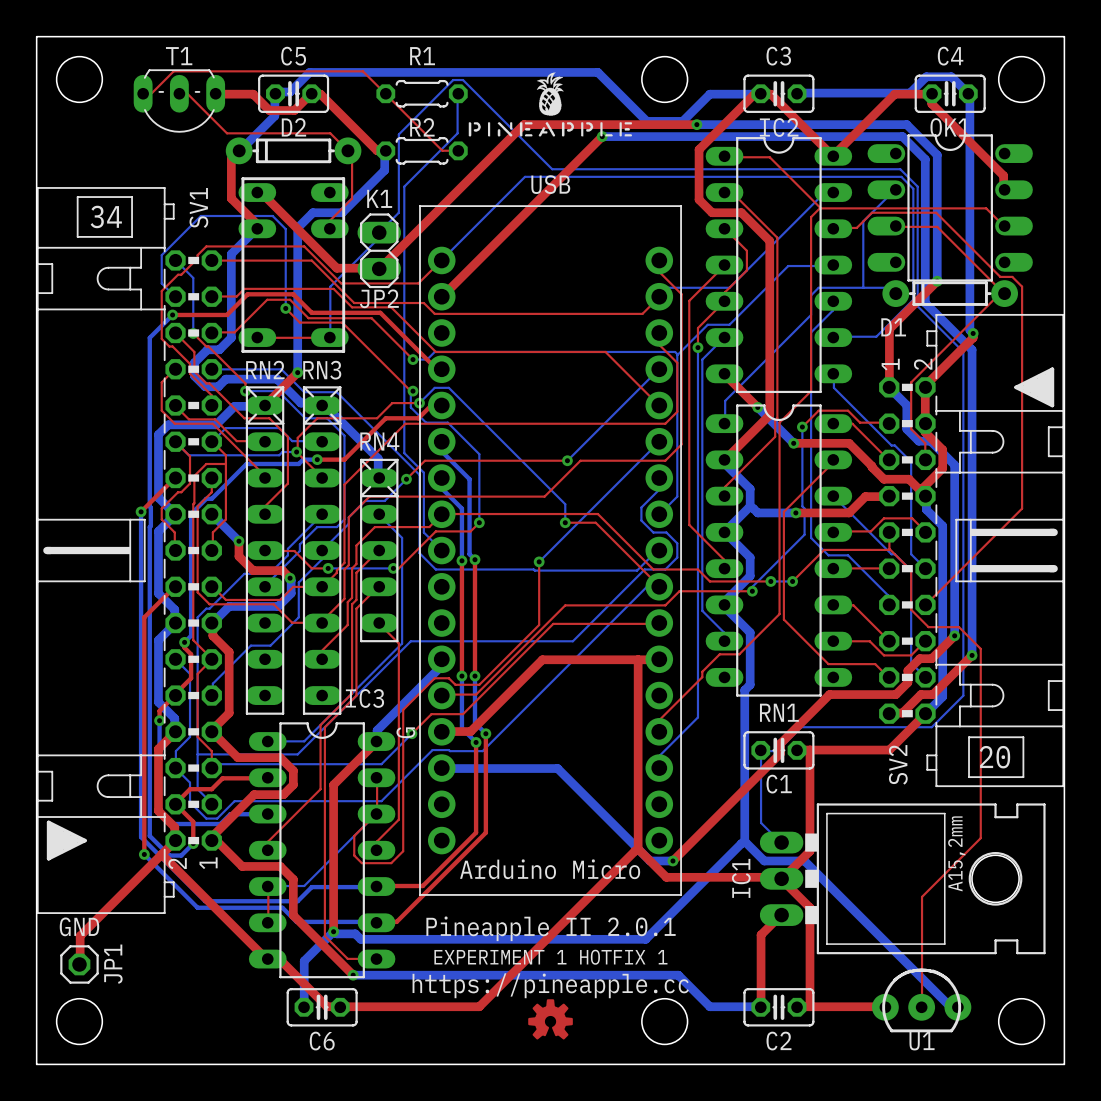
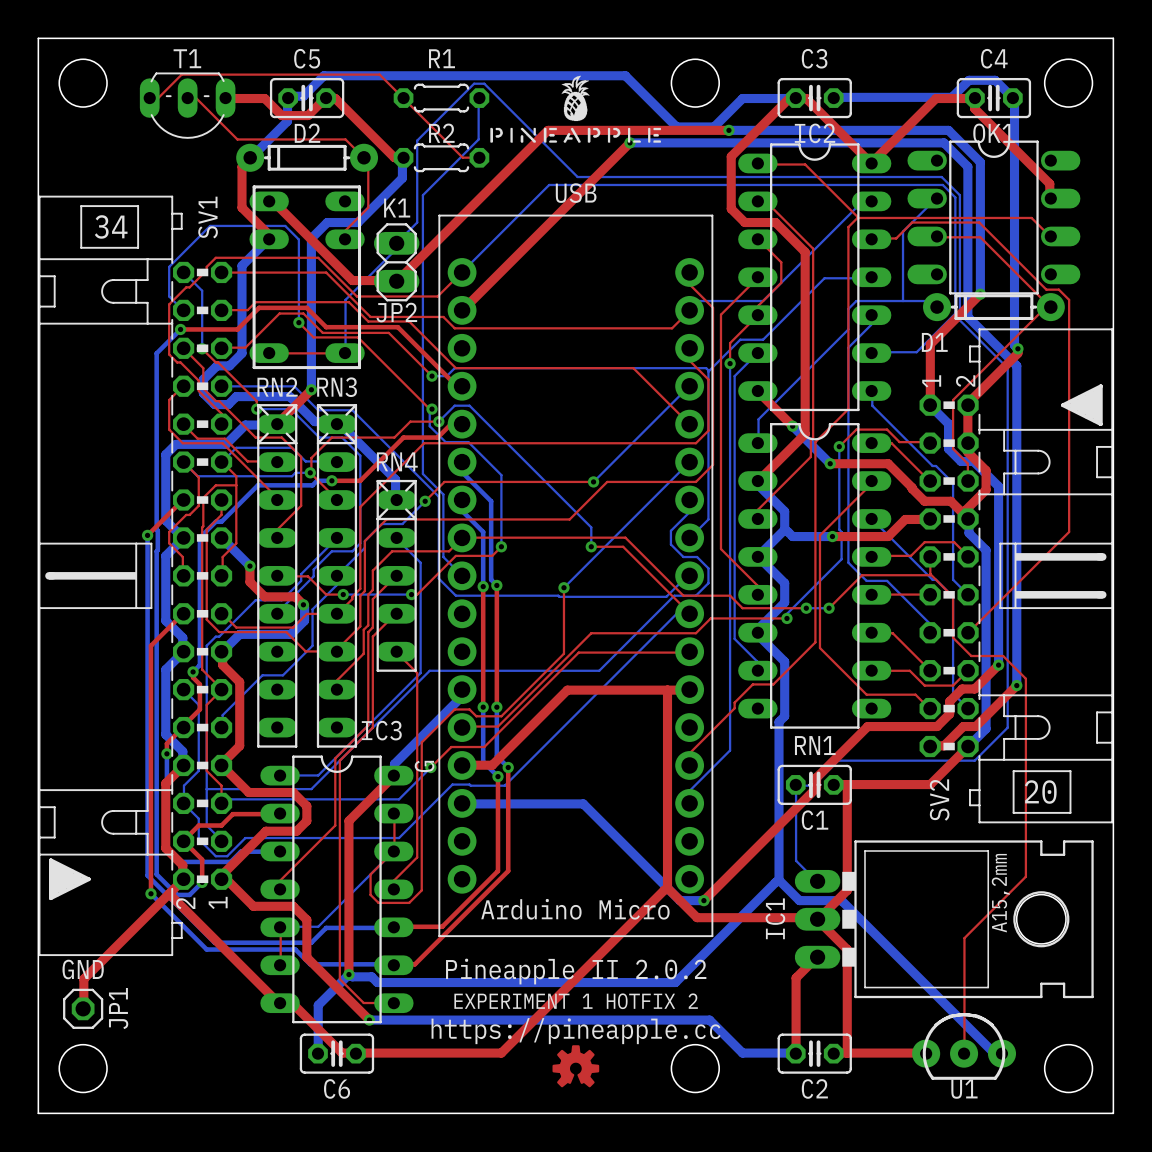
text: Pineapple II 2.0.1 (551, 928) -> Pineapple II 2.0.2 (576, 971)
text: EXPERIMENT 1 HOTFIX 1 (550, 957) -> EXPERIMENT 1 HOTFIX 2 (576, 1001)

